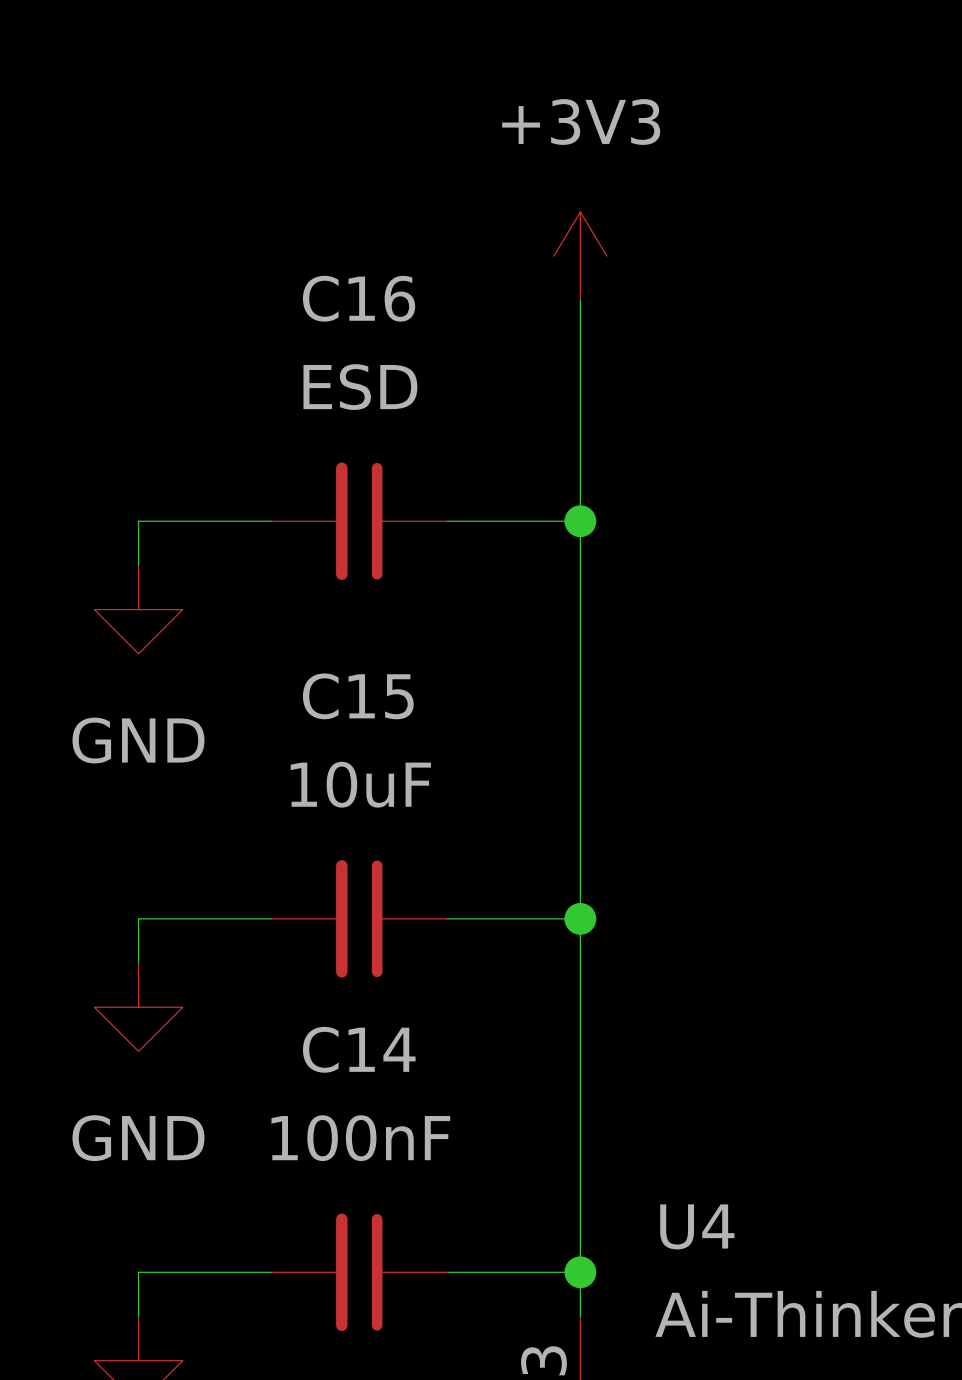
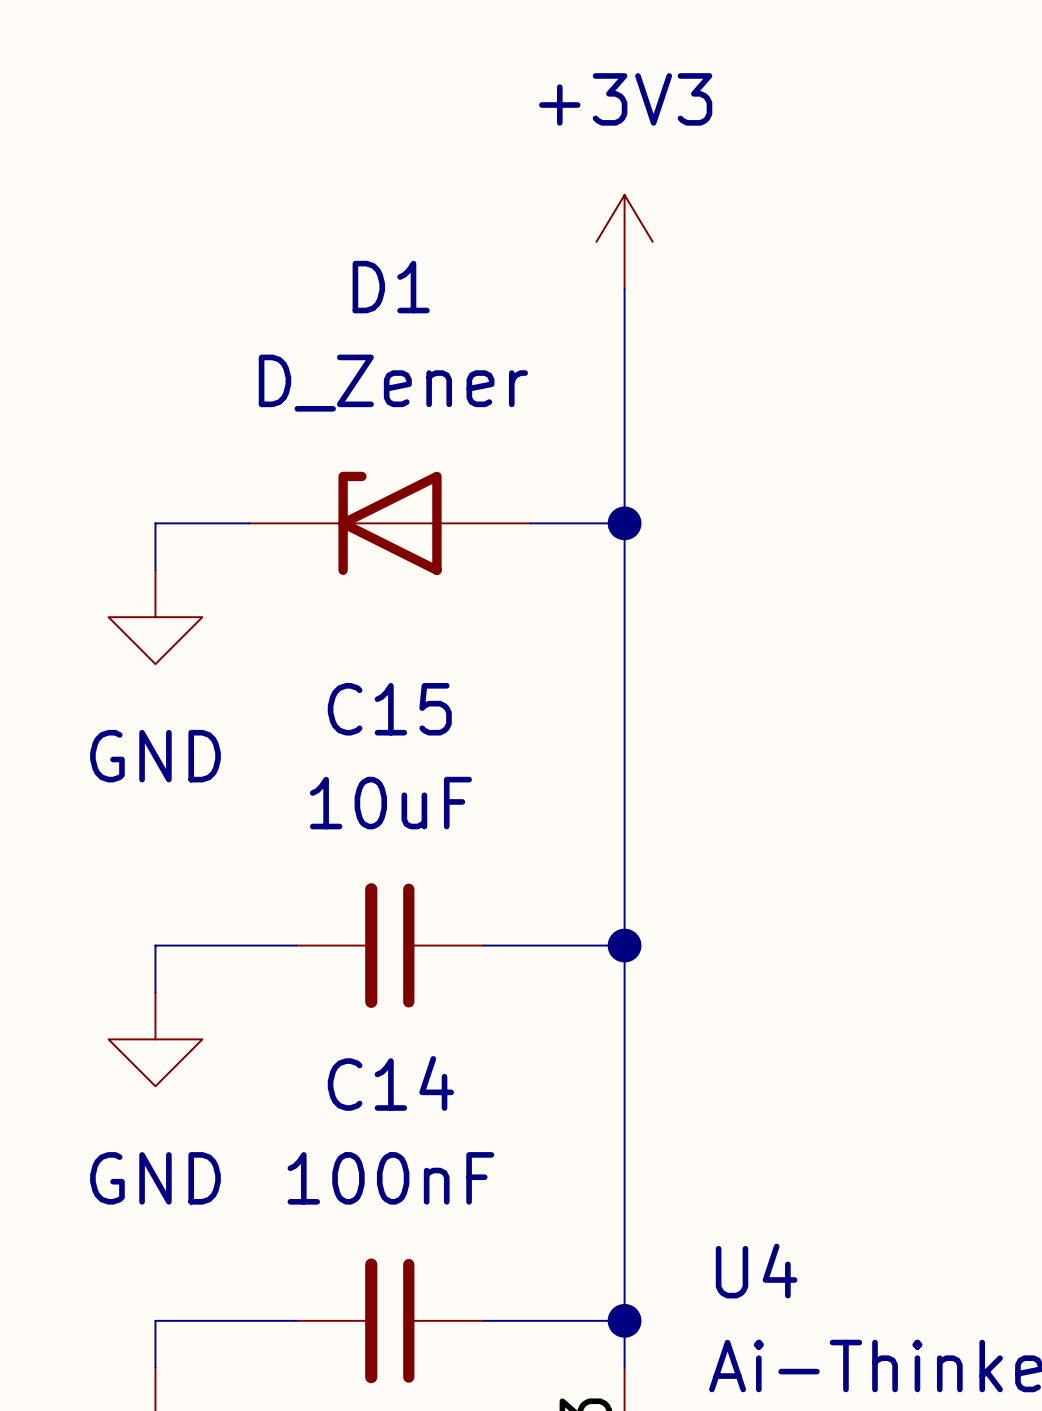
C16: ESD (359, 521) -> none
D1: none -> D_Zener (390, 523)

